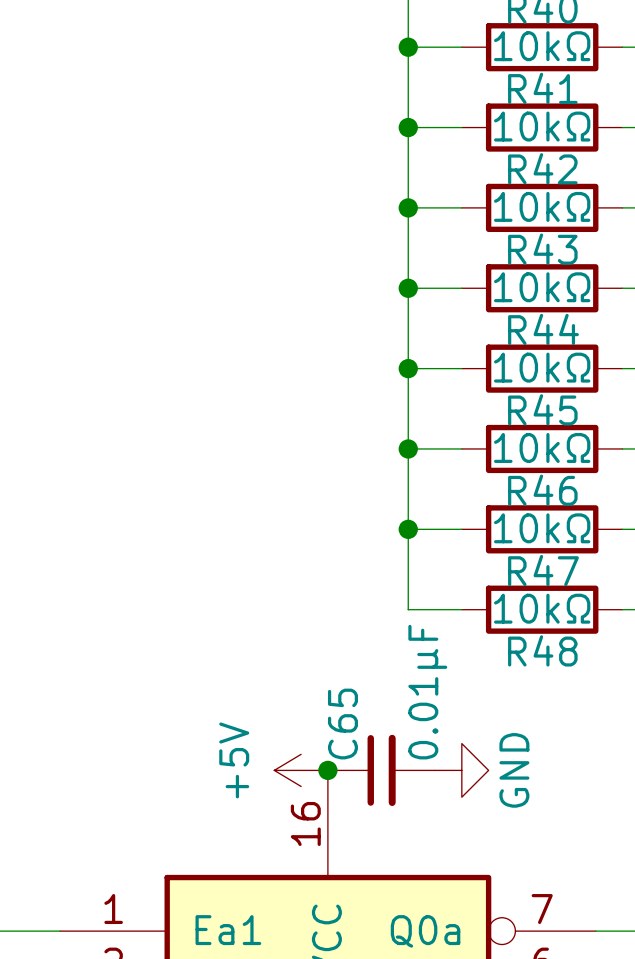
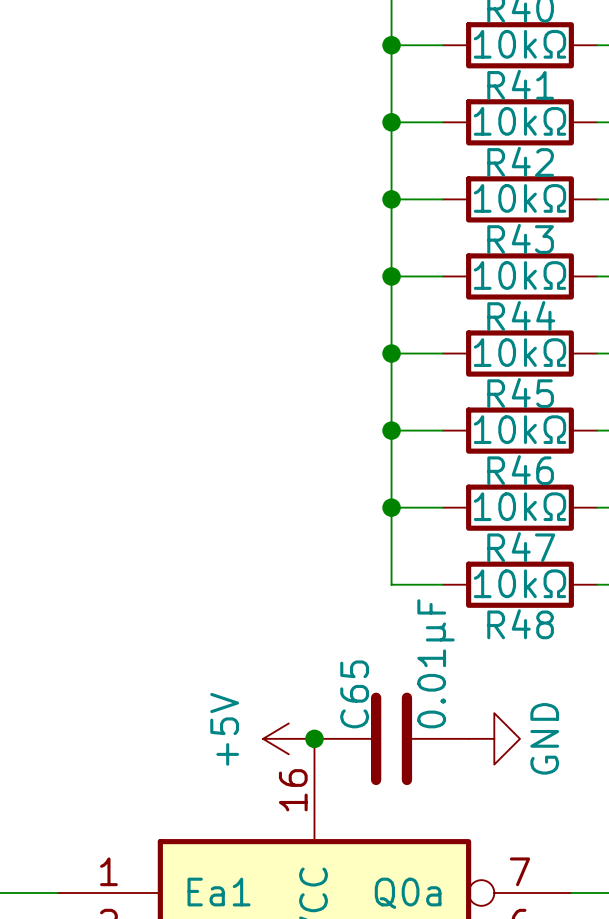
C65 symbol: [327, 734, 436, 807] -> [314, 692, 469, 786]
power symbol position: GND (461, 770) -> GND (494, 738)

